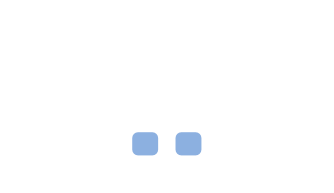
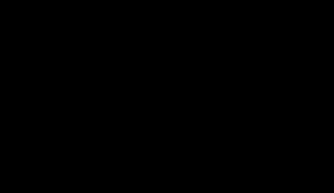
part: (166, 143) -> none

